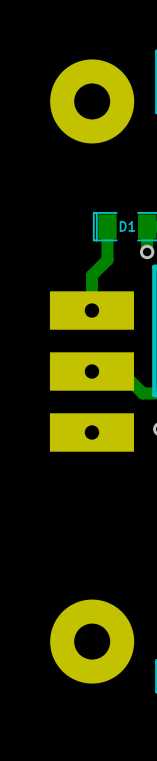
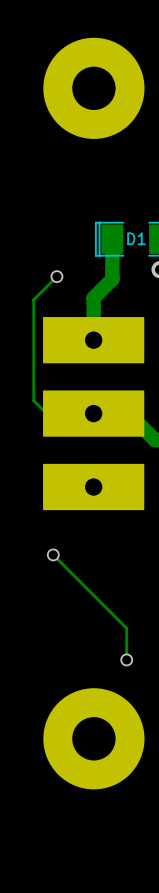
track: none -> (56, 276) (33, 299) (33, 400) (46, 413) (93, 413)
via: none -> (56, 276)
track: none -> (53, 554) (126, 628) (126, 659)
via: none -> (53, 554)
via: none -> (126, 659)

